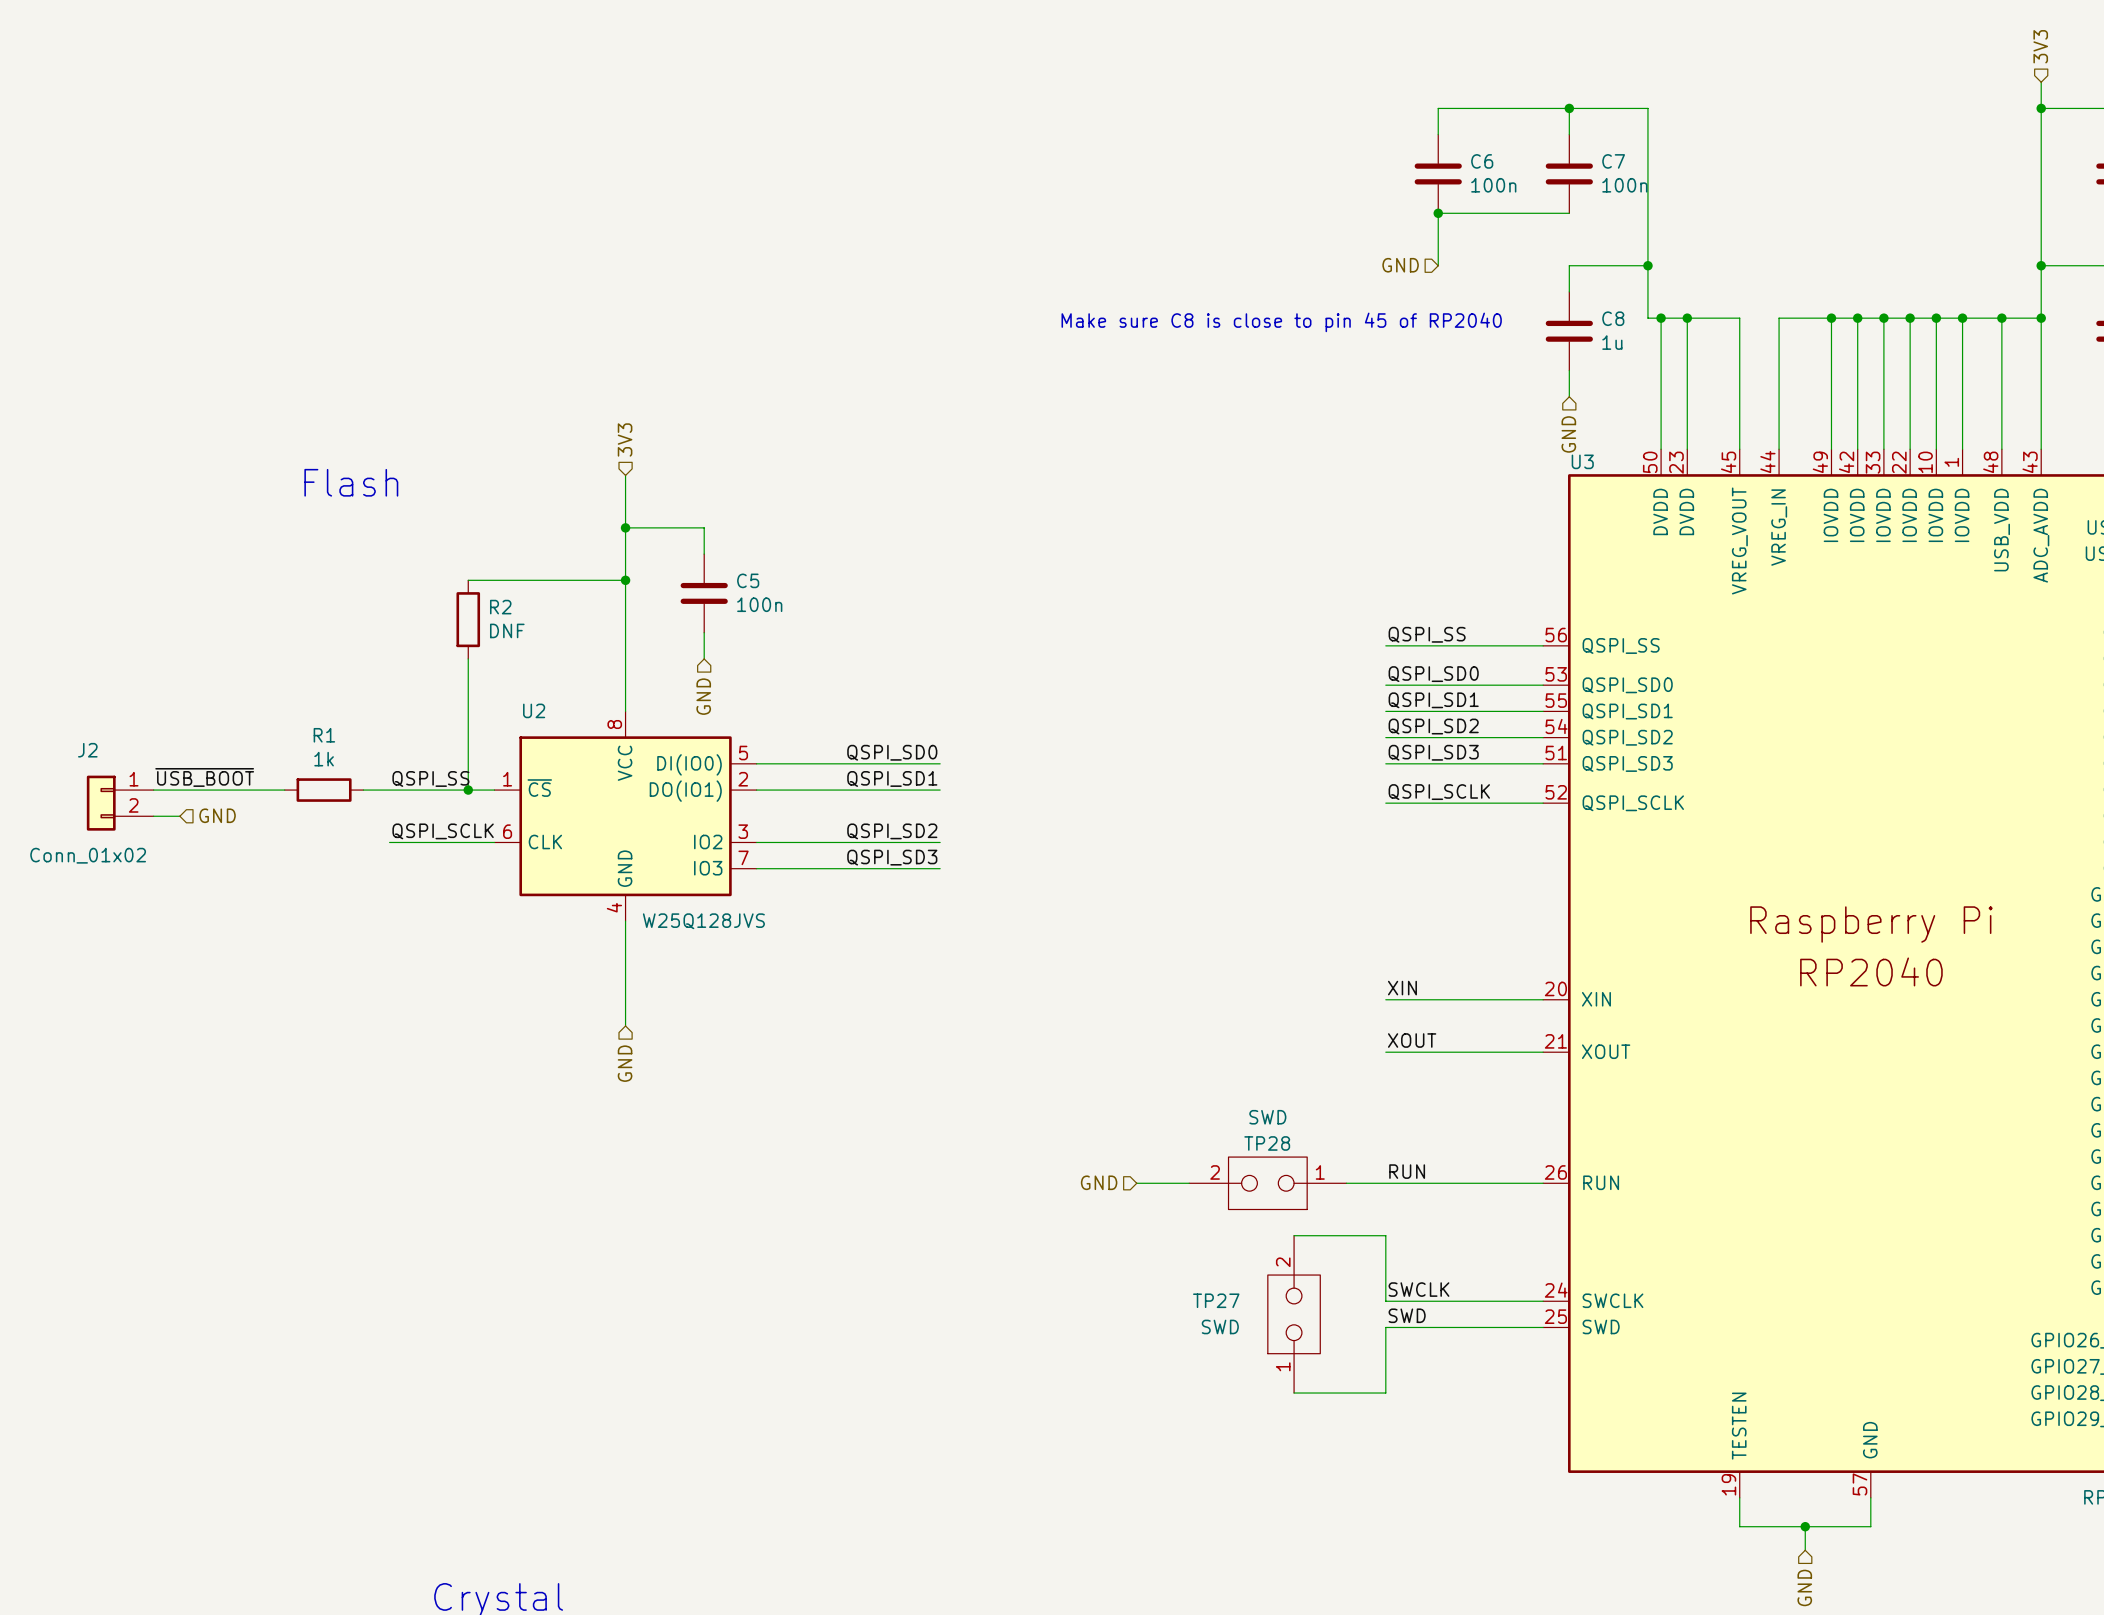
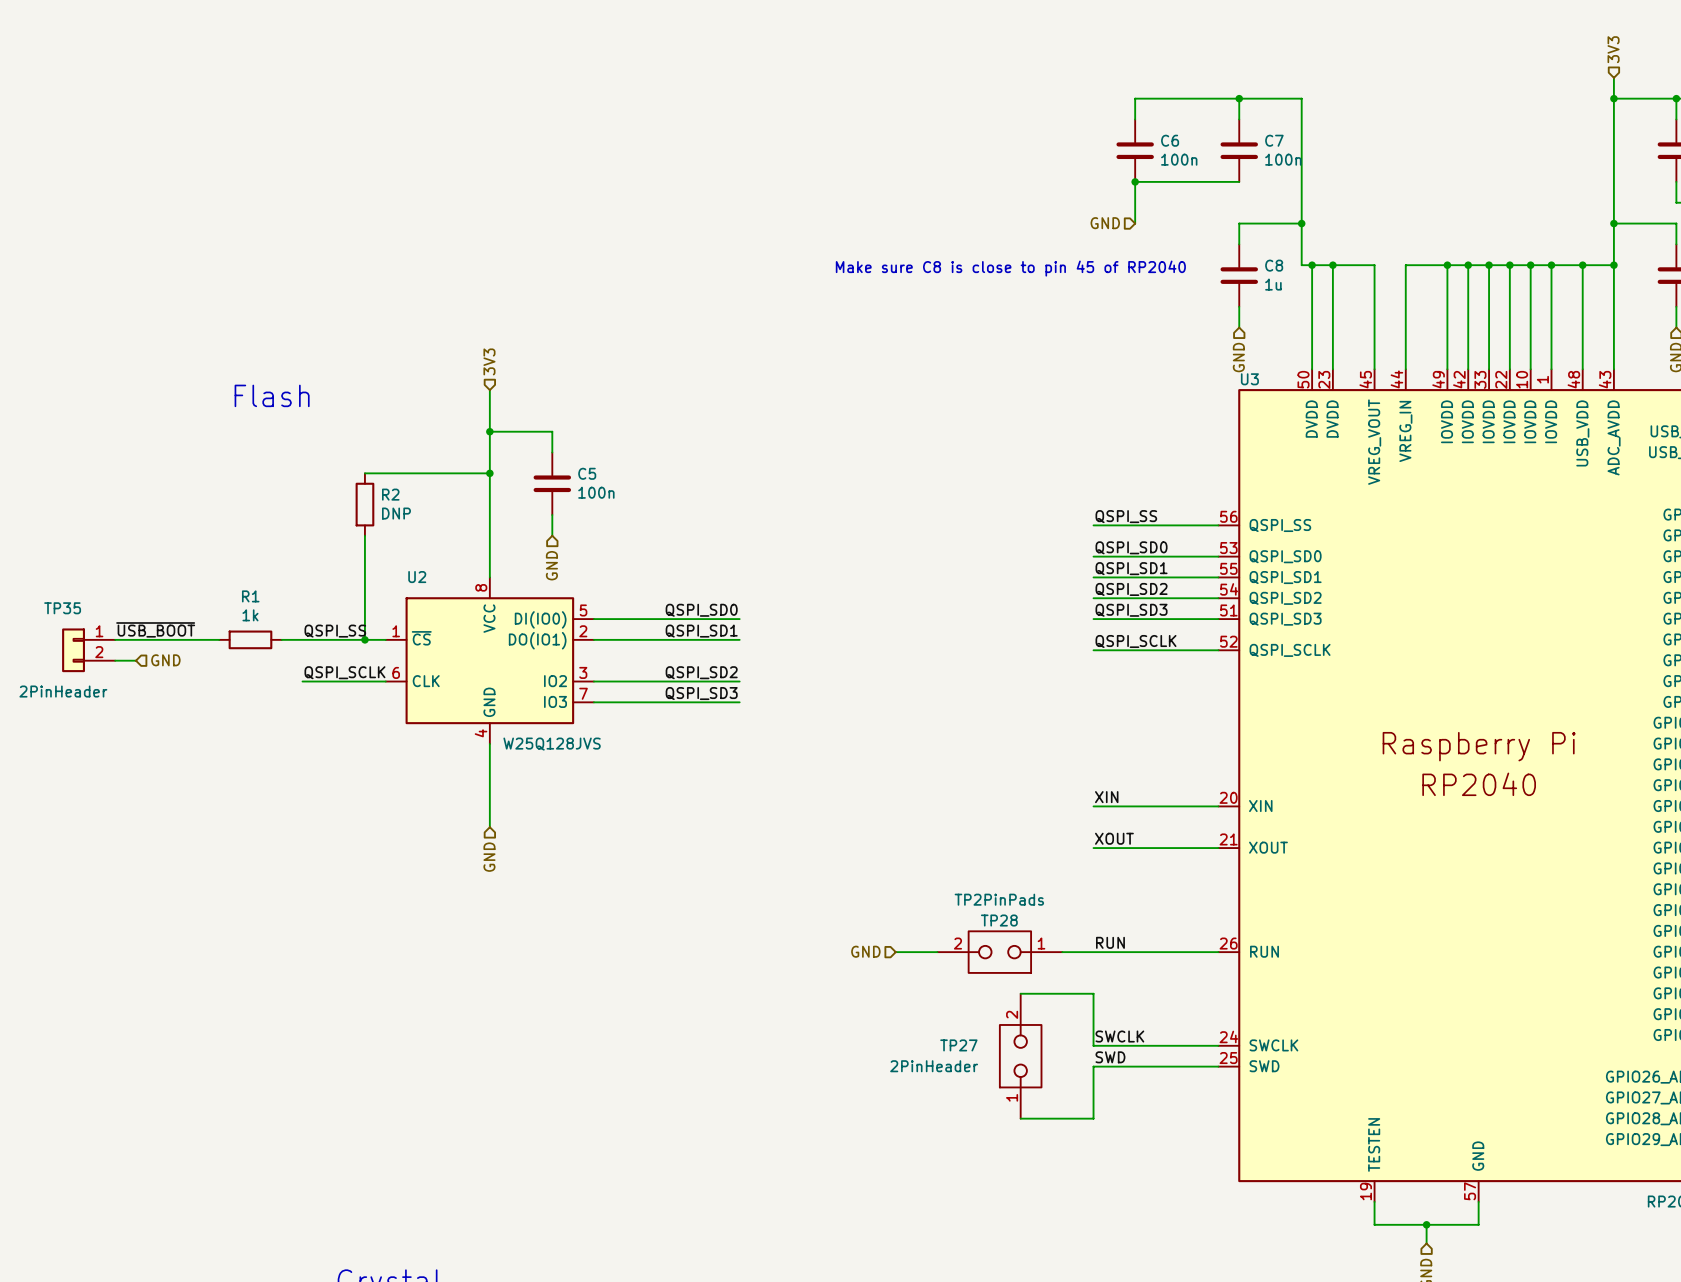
R2 value: DNF (507, 630) -> DNP (396, 513)
J2 name: J2 (87, 750) -> TP35 (62, 608)
J2 value: Conn_01x02 (88, 855) -> 2PinHeader (63, 691)
TP28 value: SWD (1267, 1117) -> TP2PinPads (999, 899)
TP27 value: SWD (1220, 1326) -> 2PinHeader (934, 1066)

